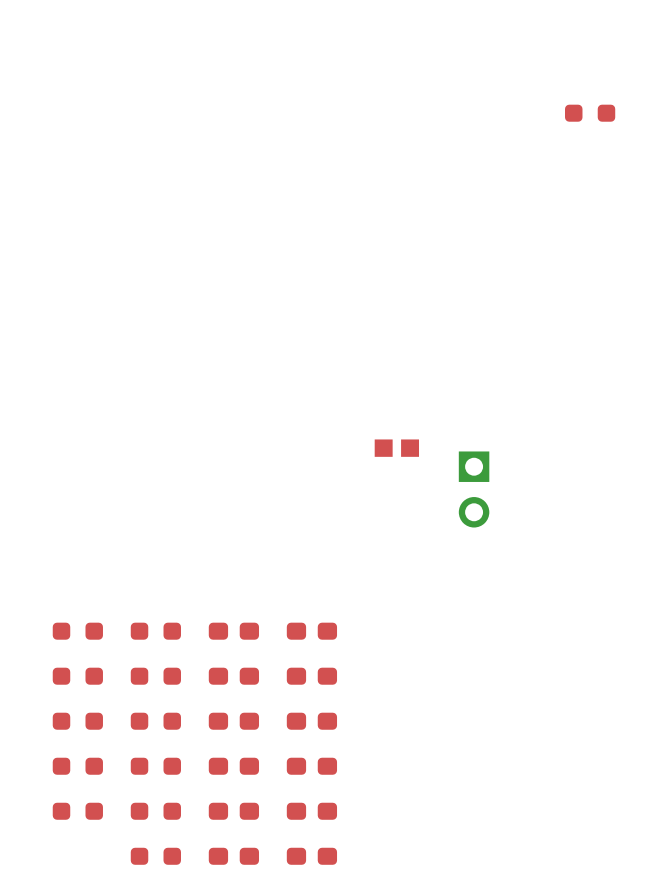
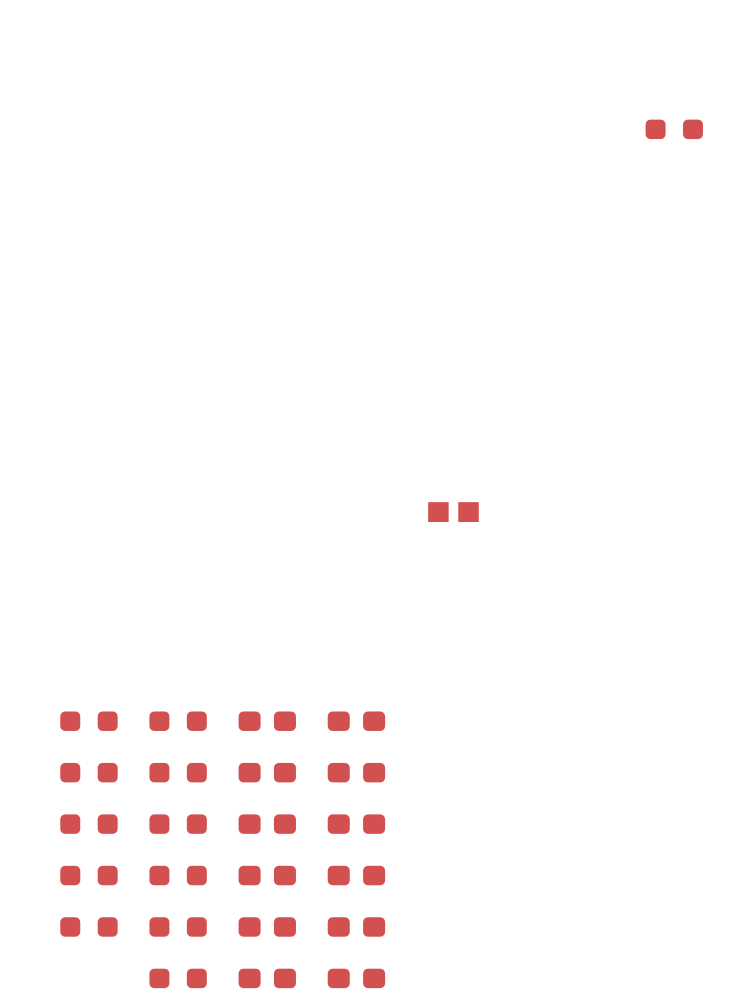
part: (474, 489) -> none

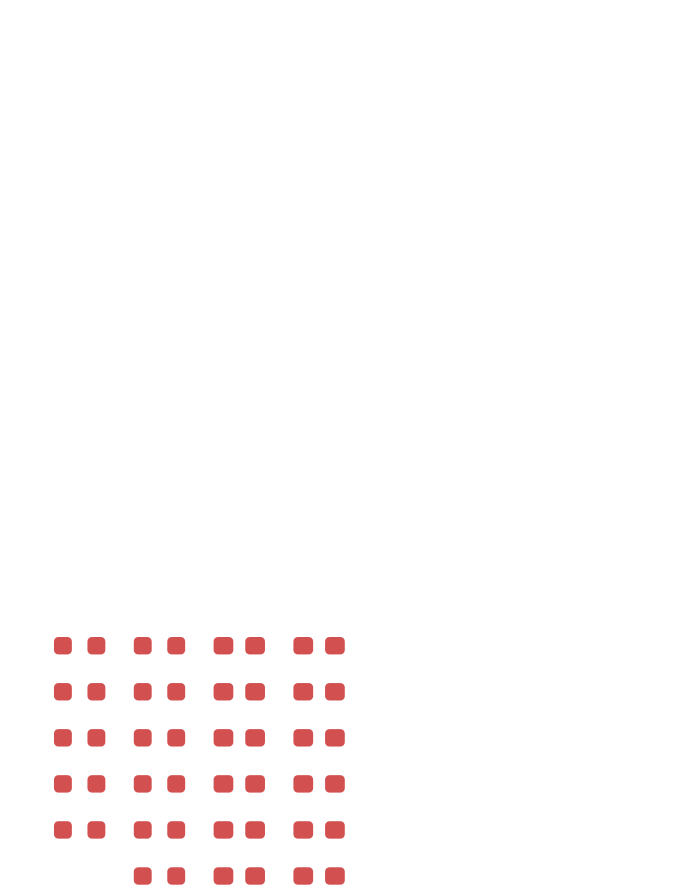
part: (674, 129) -> none
part: (453, 512) -> none

